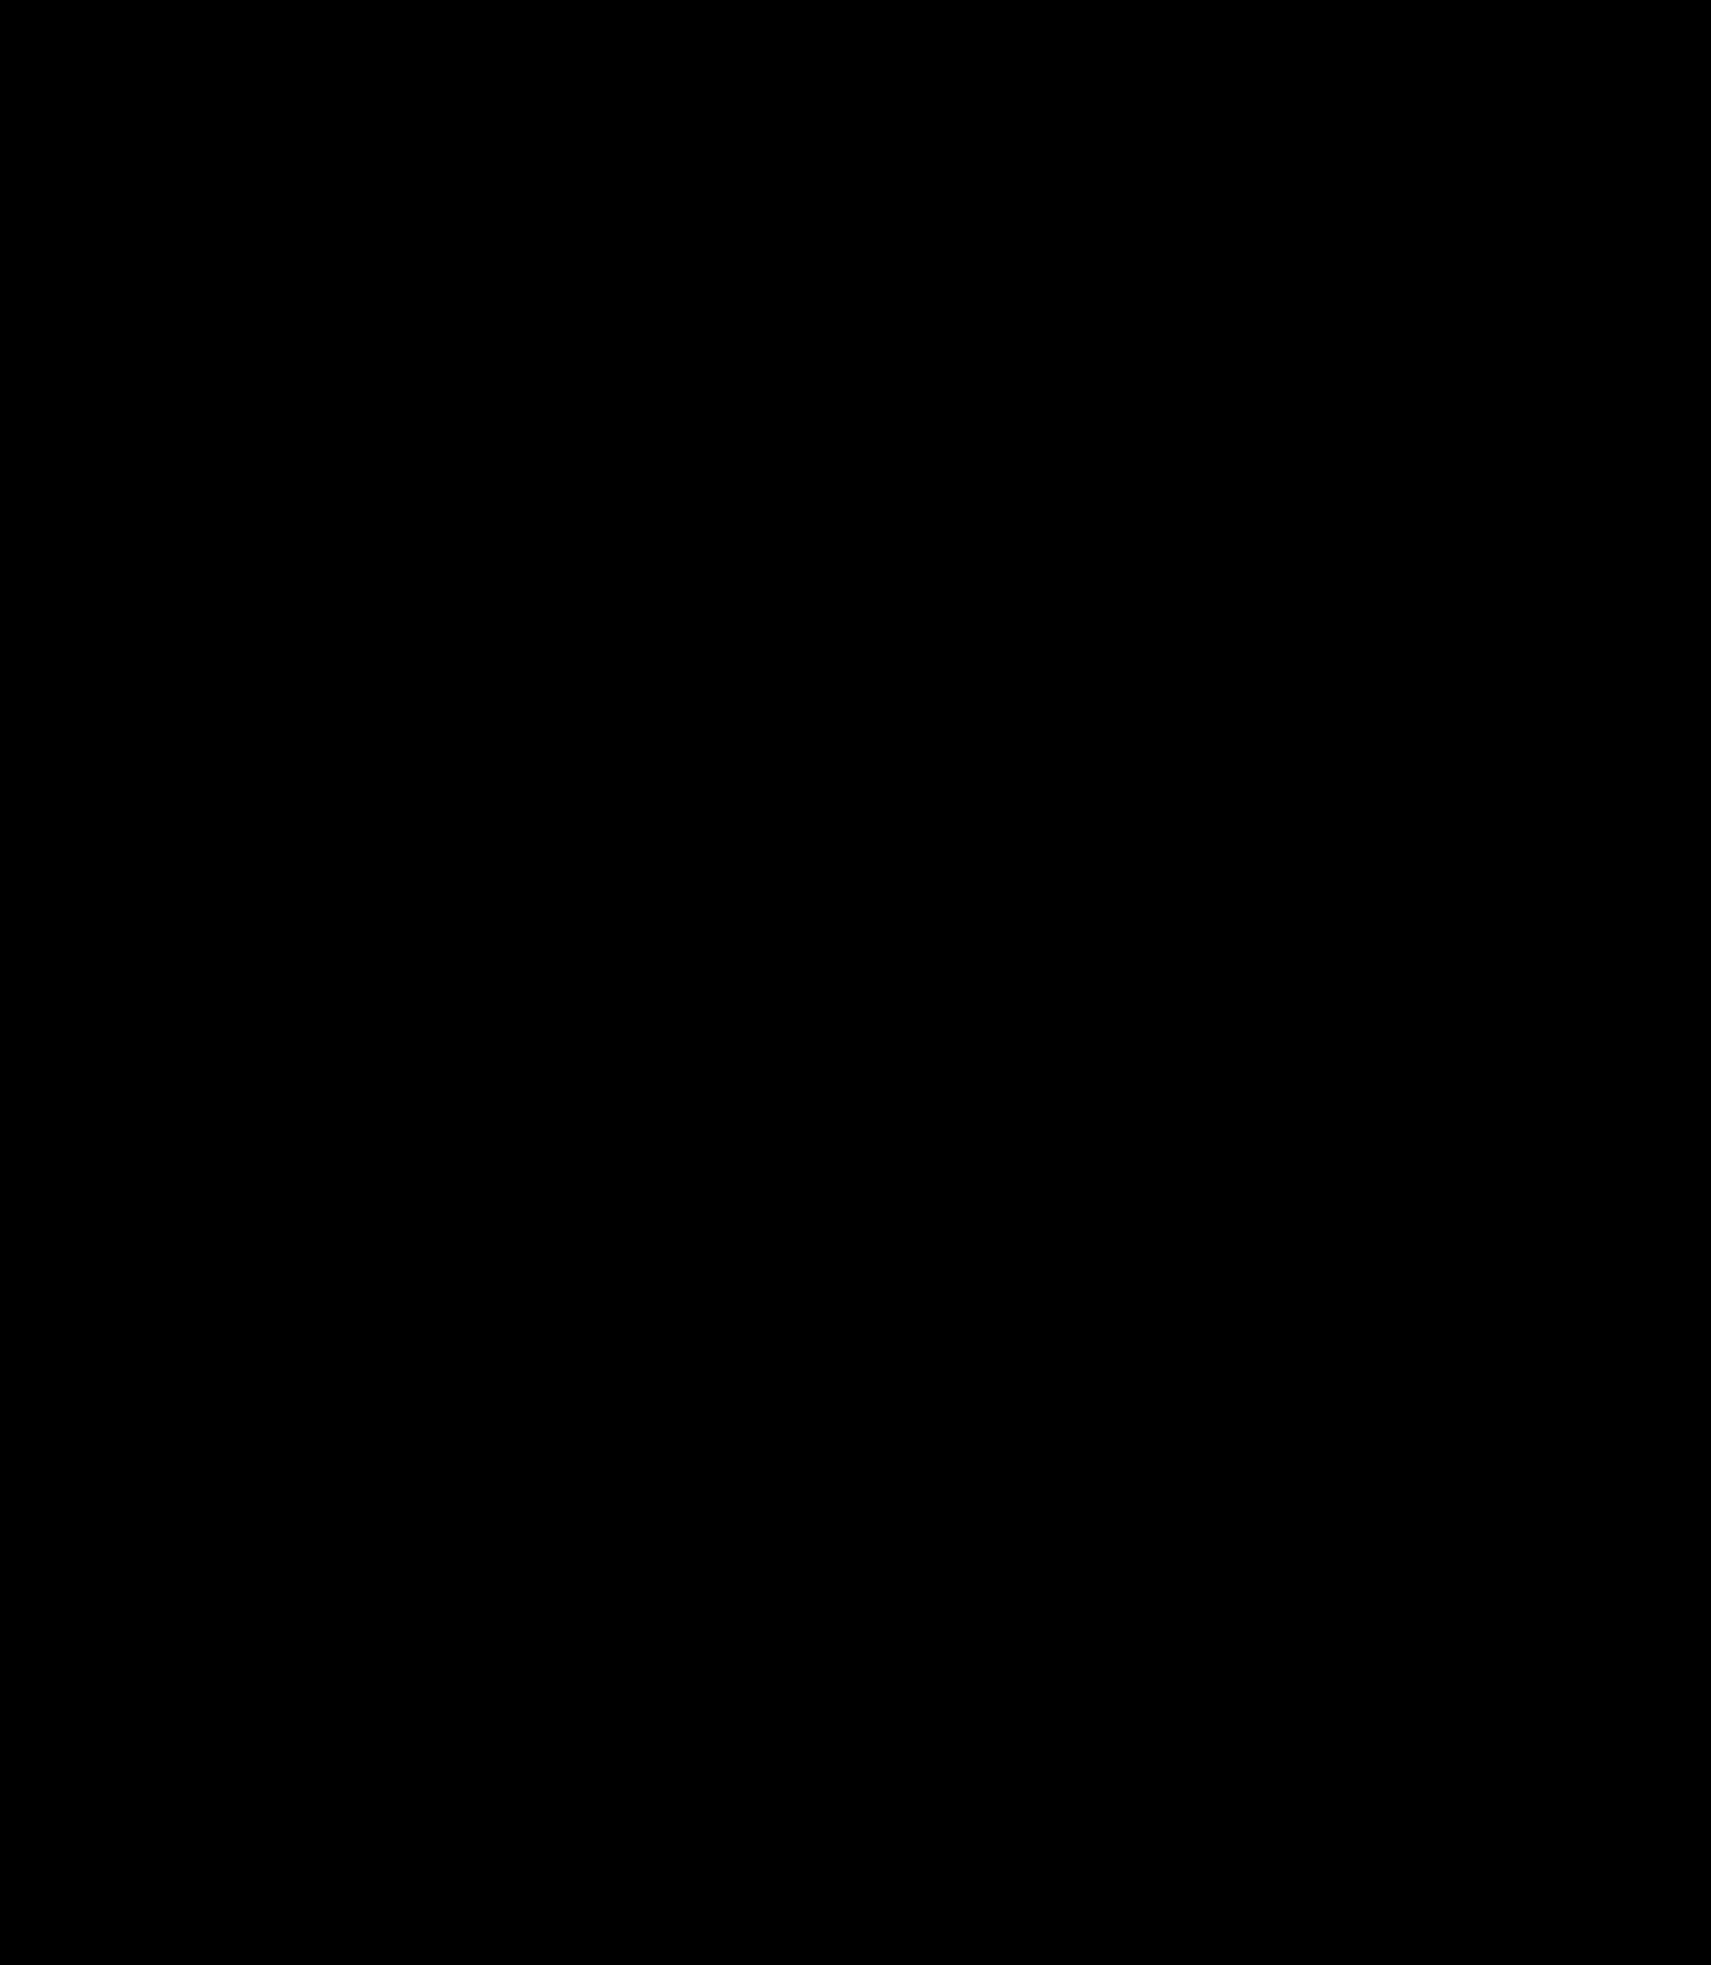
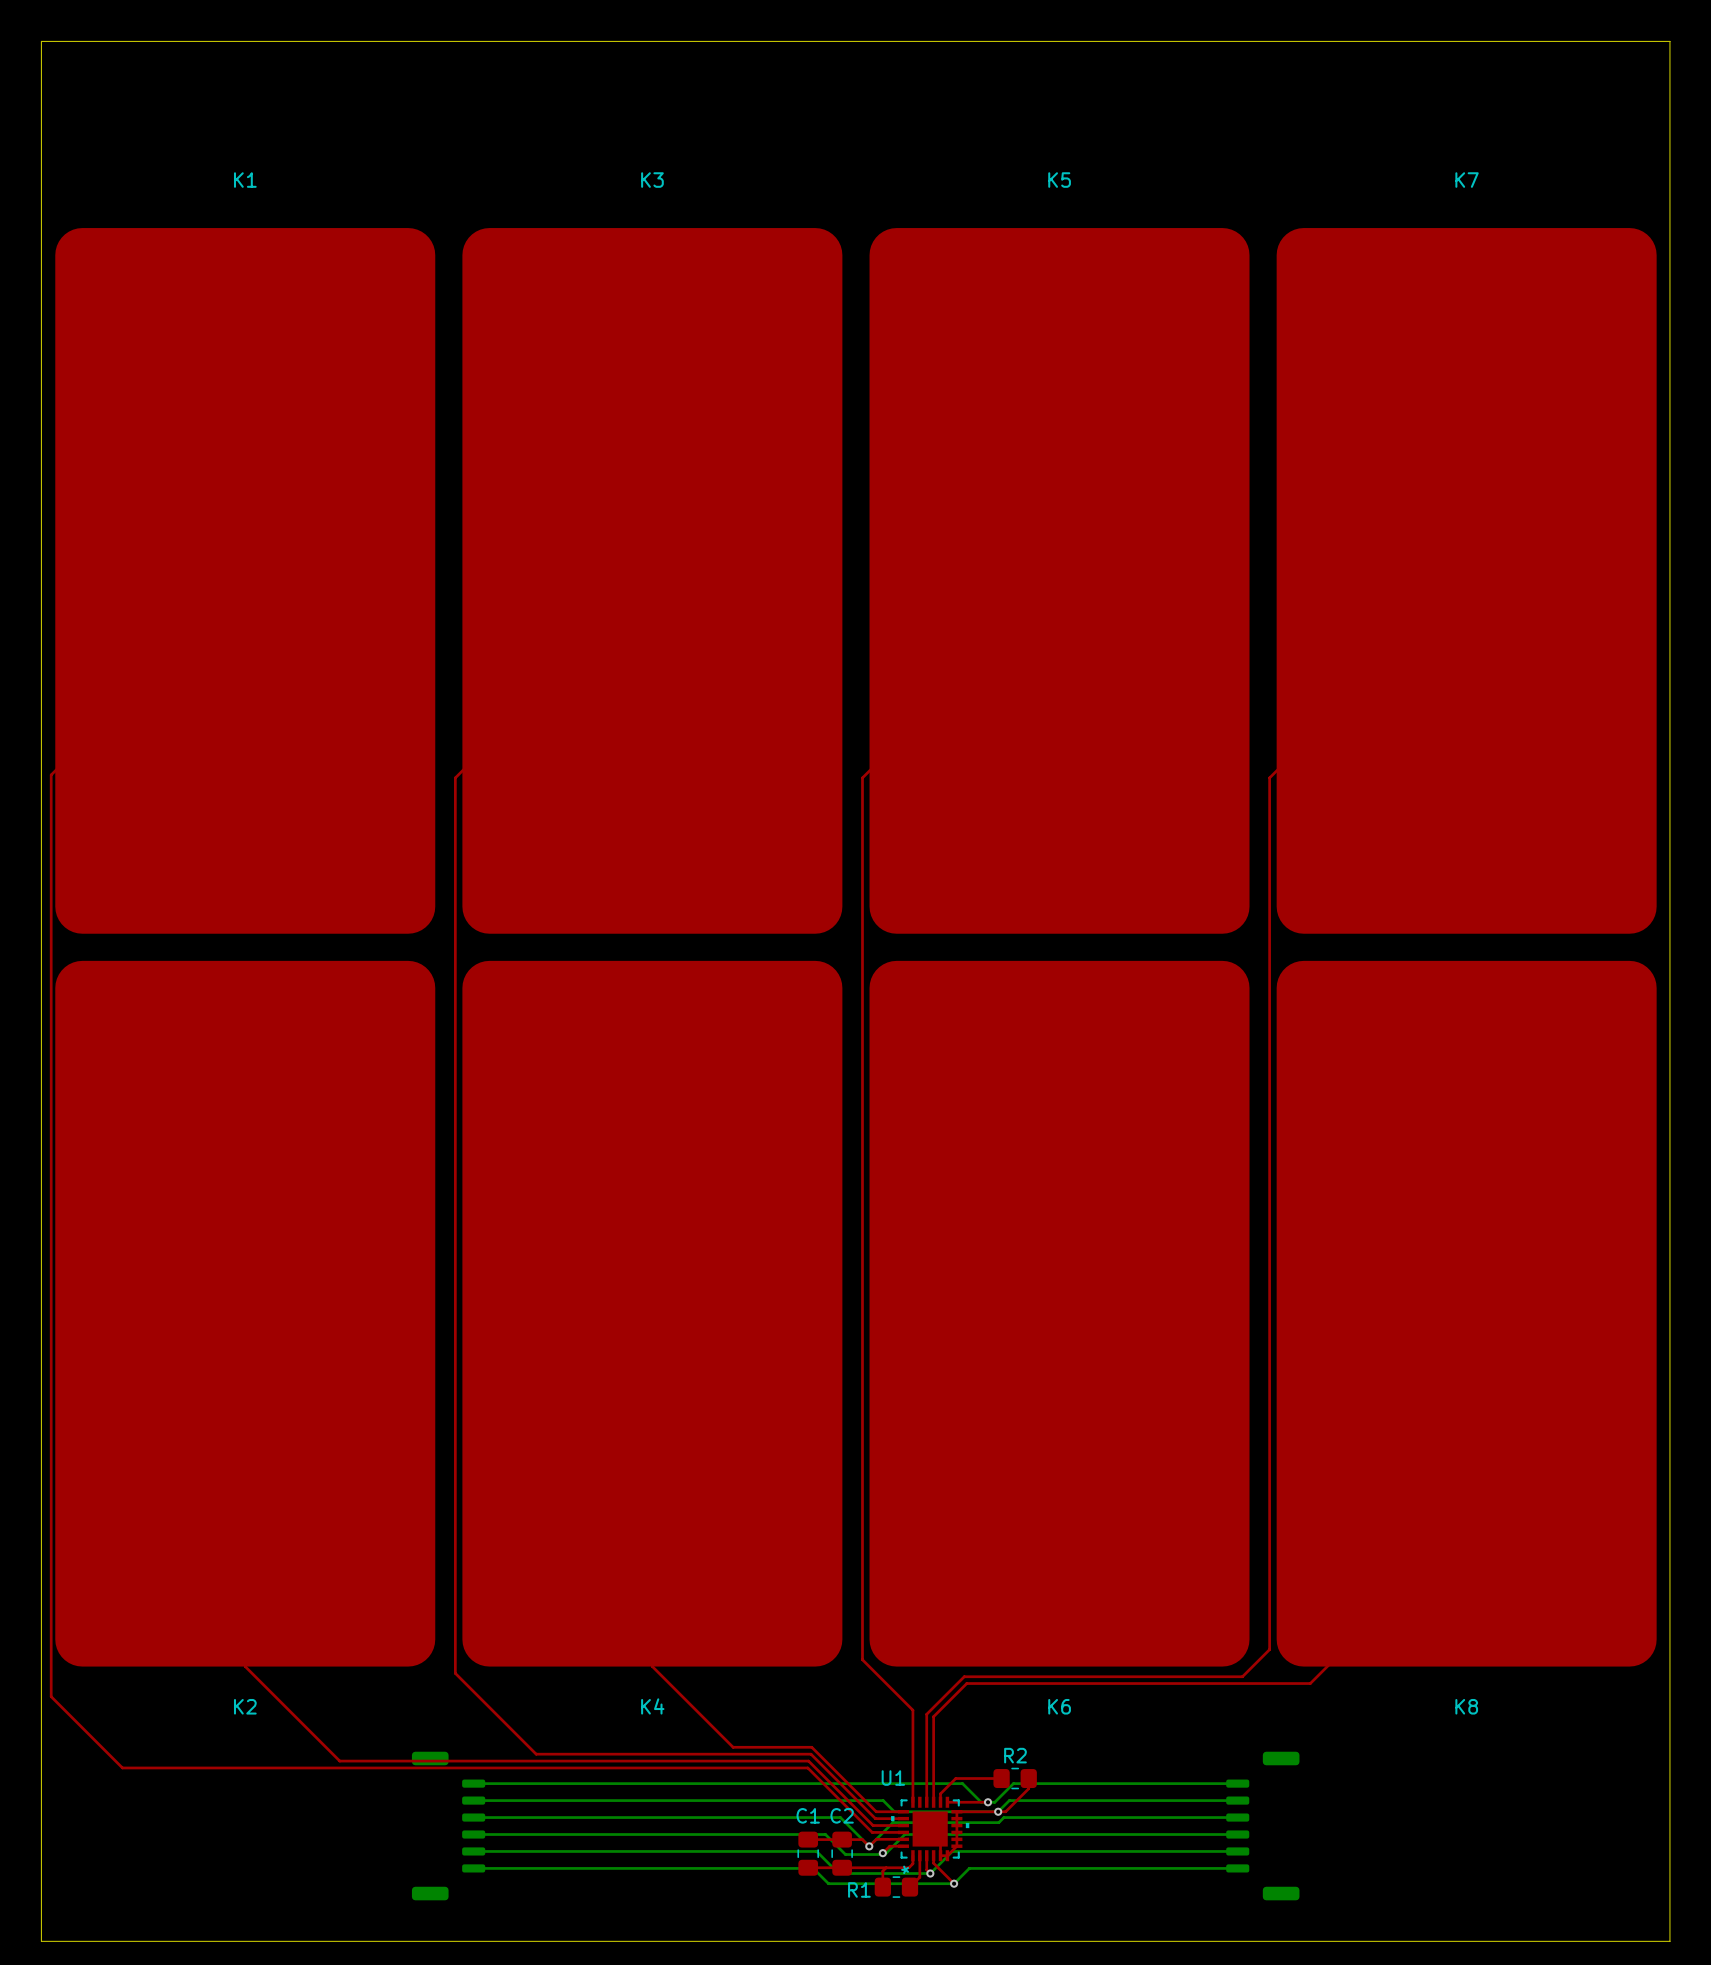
board edge: none -> (41, 41) (1669, 41) (1669, 1941) (41, 1941) (41, 41)
top track: none -> (245, 580) (51, 774) (51, 1696) (122, 1767) (807, 1767) (872, 1832) (903, 1832)
K1: none -> (245, 580)
top track: none -> (652, 580) (455, 777) (455, 1673) (536, 1754) (811, 1754) (875, 1818) (903, 1818)
K3: none -> (652, 580)
top track: none -> (1059, 580) (862, 777) (862, 1659) (912, 1710) (912, 1802)
K5: none -> (1059, 580)
top track: none -> (1466, 580) (1269, 777) (1269, 1649) (1242, 1676) (964, 1676) (926, 1714) (926, 1802)
K7: none -> (1466, 580)
top track: none -> (245, 1313) (245, 1666) (339, 1761) (808, 1761) (873, 1825) (903, 1825)
K2: none -> (245, 1313)
top track: none -> (652, 1313) (652, 1666) (733, 1747) (811, 1747) (876, 1811) (903, 1811)
K4: none -> (652, 1313)
K6: none -> (1059, 1313)
top track: none -> (1466, 1313) (1466, 1527) (1310, 1683) (966, 1683) (933, 1716) (933, 1802)
K8: none -> (1466, 1313)
top track: none -> (1001, 1778) (955, 1778) (940, 1793) (940, 1802)
R2: none -> (1015, 1778)
top track: none -> (1028, 1778) (1028, 1788) (1005, 1811) (956, 1811) (956, 1846) (947, 1855) (940, 1855) (940, 1839) (930, 1828)
bottom track: none -> (473, 1783) (962, 1783) (981, 1802) (994, 1802) (1013, 1783) (1237, 1783)
bottom track: none -> (473, 1800) (883, 1800) (894, 1811) (998, 1811) (1009, 1800) (1237, 1800)
top track: none -> (947, 1802) (988, 1802)
via: none -> (988, 1802)
via: none -> (998, 1811)
bottom track: none -> (473, 1817) (840, 1817) (869, 1846) (893, 1822) (998, 1822) (1003, 1817) (1237, 1817)
part: none -> (448, 1826)
part: none -> (1262, 1826)
U1: none -> (930, 1828)
bottom track: none -> (473, 1834) (825, 1834) (845, 1854) (886, 1853) (904, 1834) (1237, 1834)
top track: none -> (903, 1839) (876, 1839) (869, 1846) (862, 1839) (808, 1839)
via: none -> (869, 1846)
top track: none -> (903, 1846) (889, 1846) (882, 1853)
bottom track: none -> (473, 1851) (816, 1851) (838, 1873) (930, 1873) (952, 1851) (1237, 1851)
C1: none -> (808, 1853)
C2: none -> (842, 1853)
via: none -> (882, 1853)
top track: none -> (912, 1855) (912, 1863) (908, 1867) (808, 1867)
top track: none -> (919, 1855) (919, 1877) (909, 1887)
top track: none -> (926, 1855) (926, 1869) (930, 1873)
top track: none -> (933, 1855) (933, 1863) (954, 1883)
top track: none -> (886, 1867) (882, 1871) (882, 1887)
bottom track: none -> (473, 1868) (813, 1868) (828, 1883) (954, 1883) (969, 1868) (1237, 1868)
via: none -> (930, 1873)
via: none -> (954, 1883)
R1: none -> (896, 1887)

